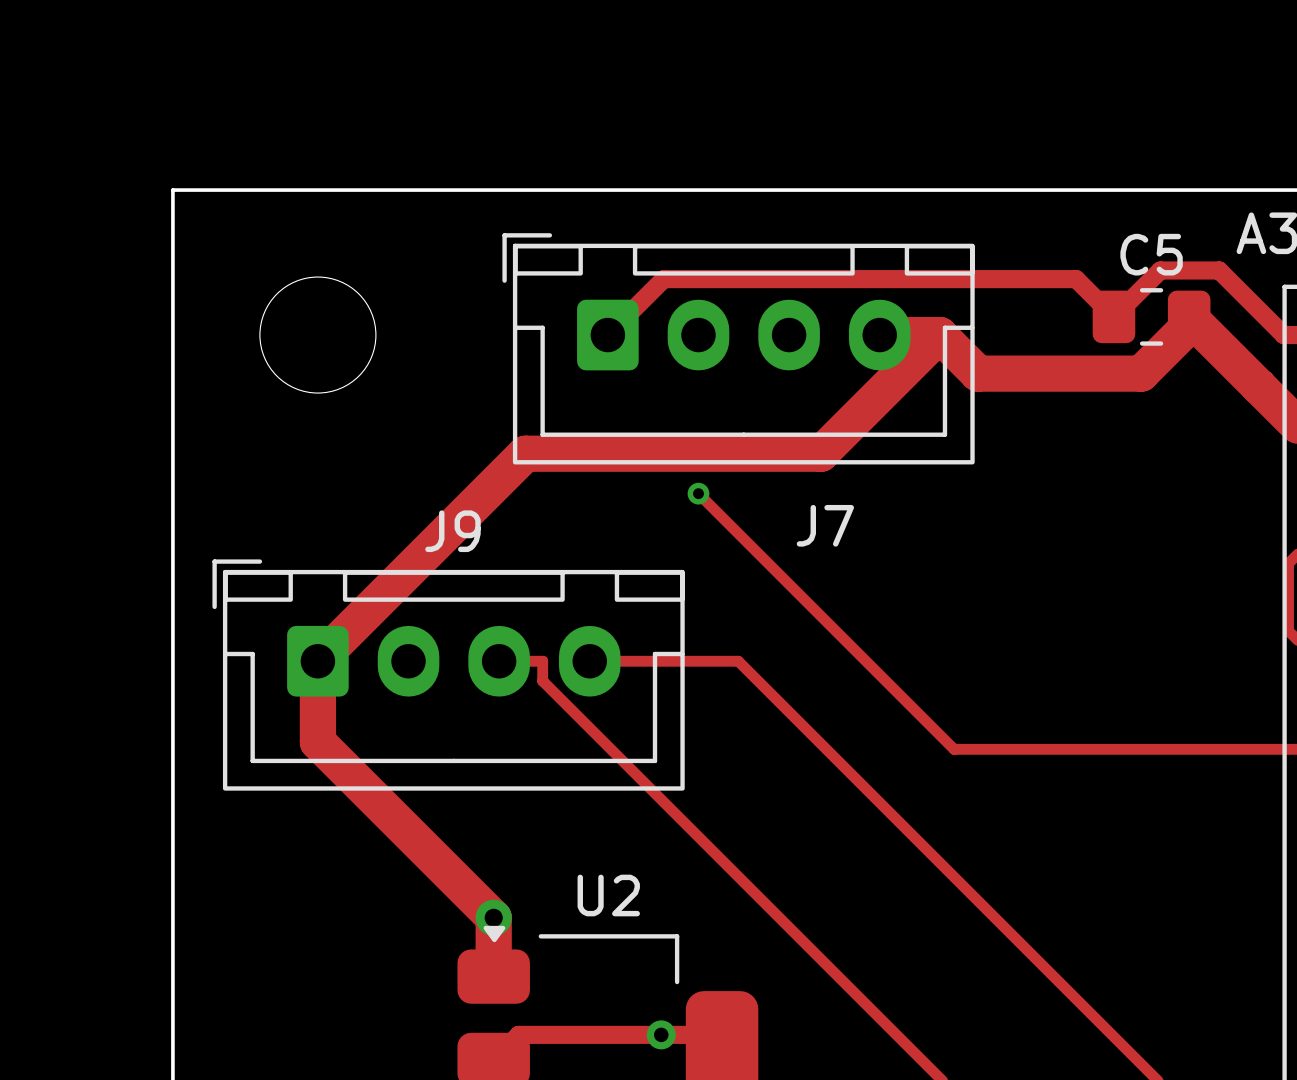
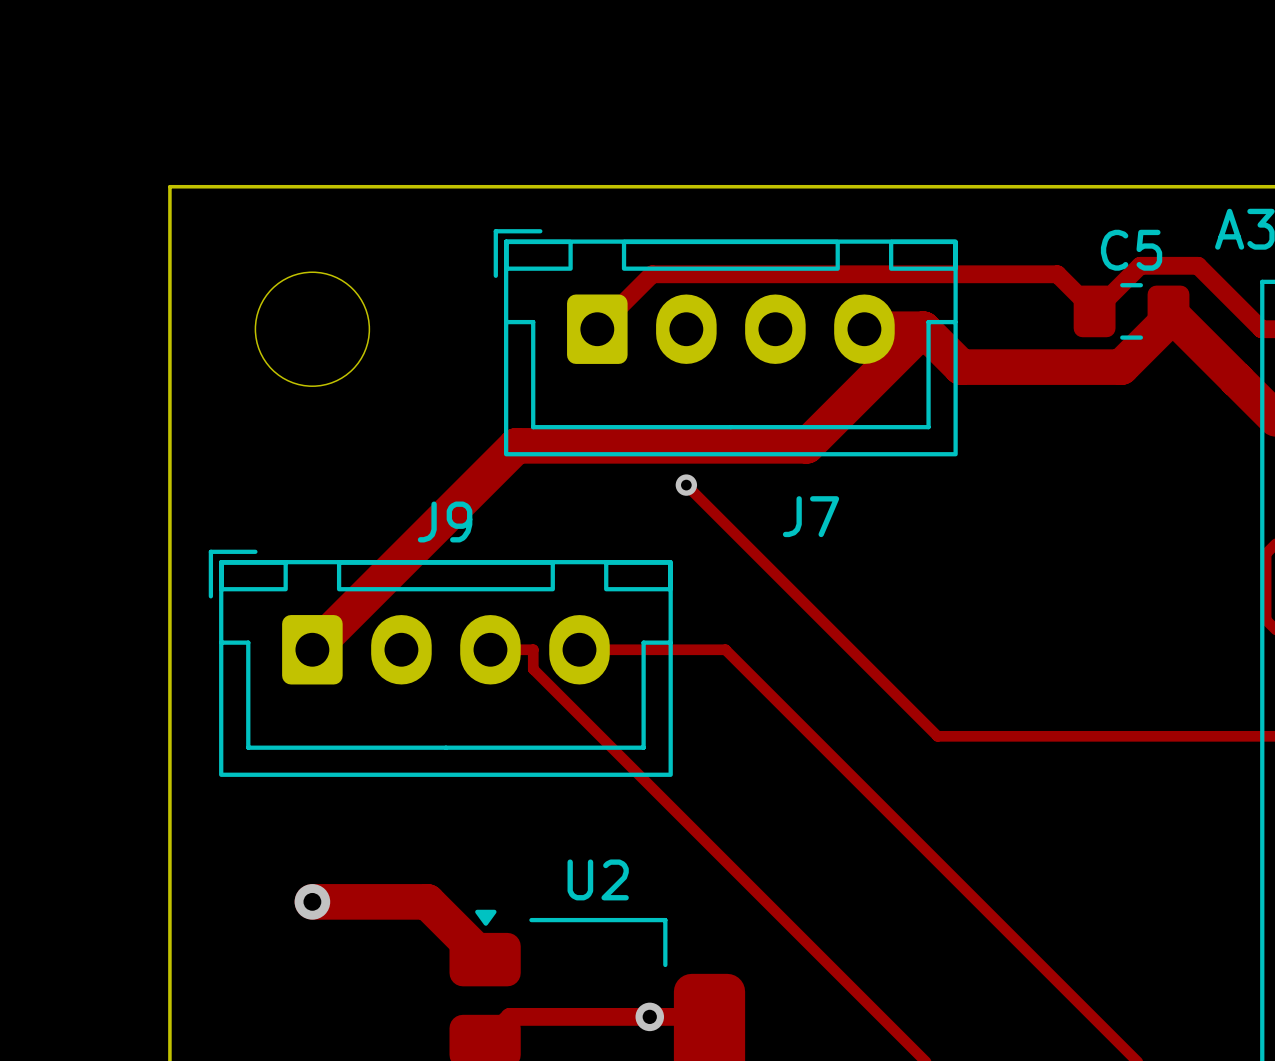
track: (317, 661) (317, 742) (493, 917) (493, 976) -> (312, 901) (427, 901) (485, 959)
via position: (493, 917) -> (312, 901)

